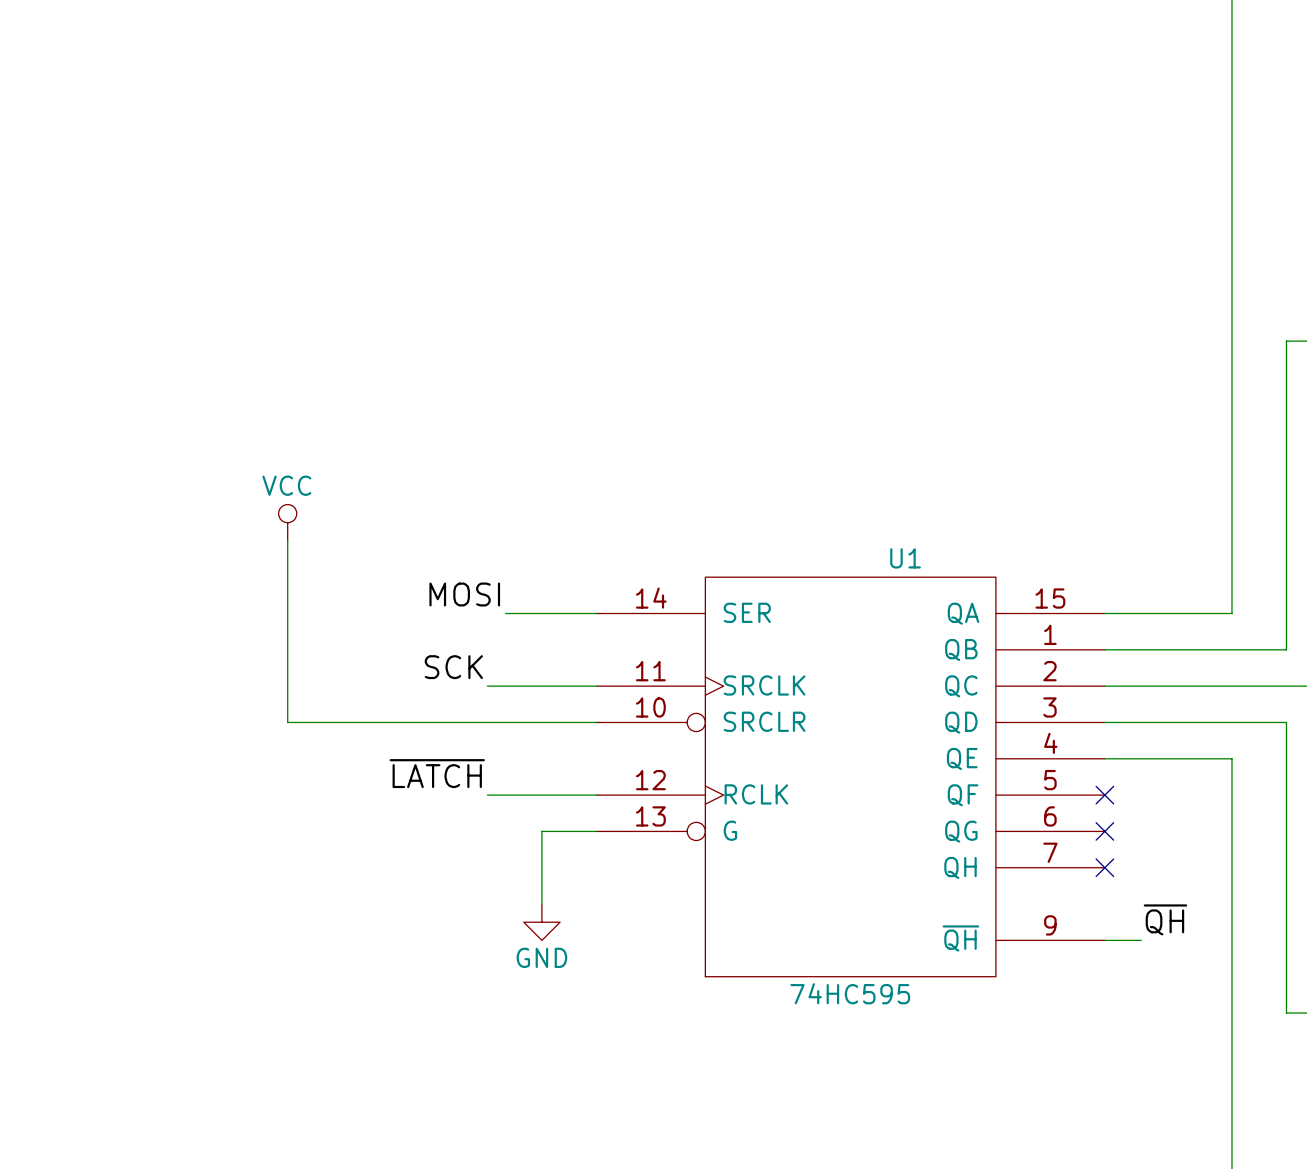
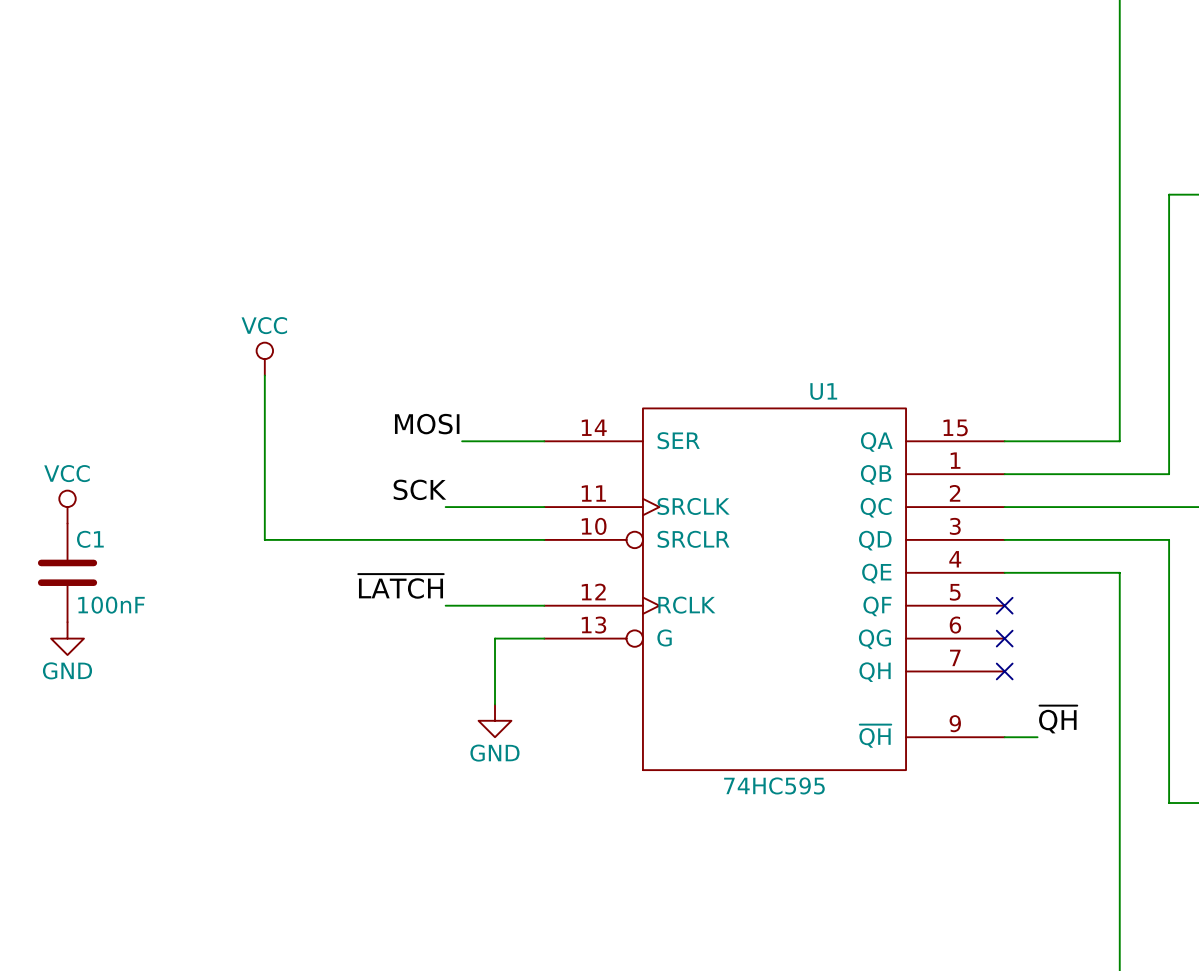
power symbol: none -> VCC (67, 507)
C1: none -> 100nF (67, 572)
power symbol: none -> GND (67, 638)

